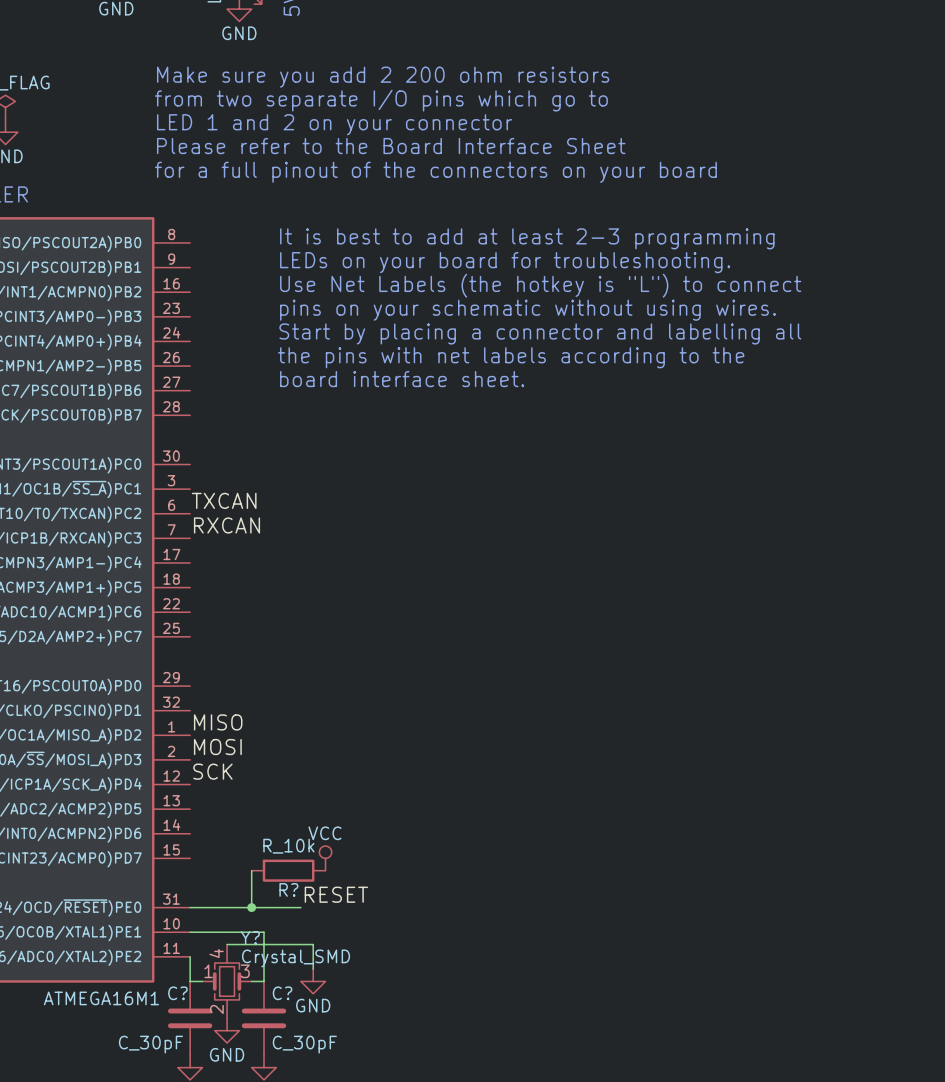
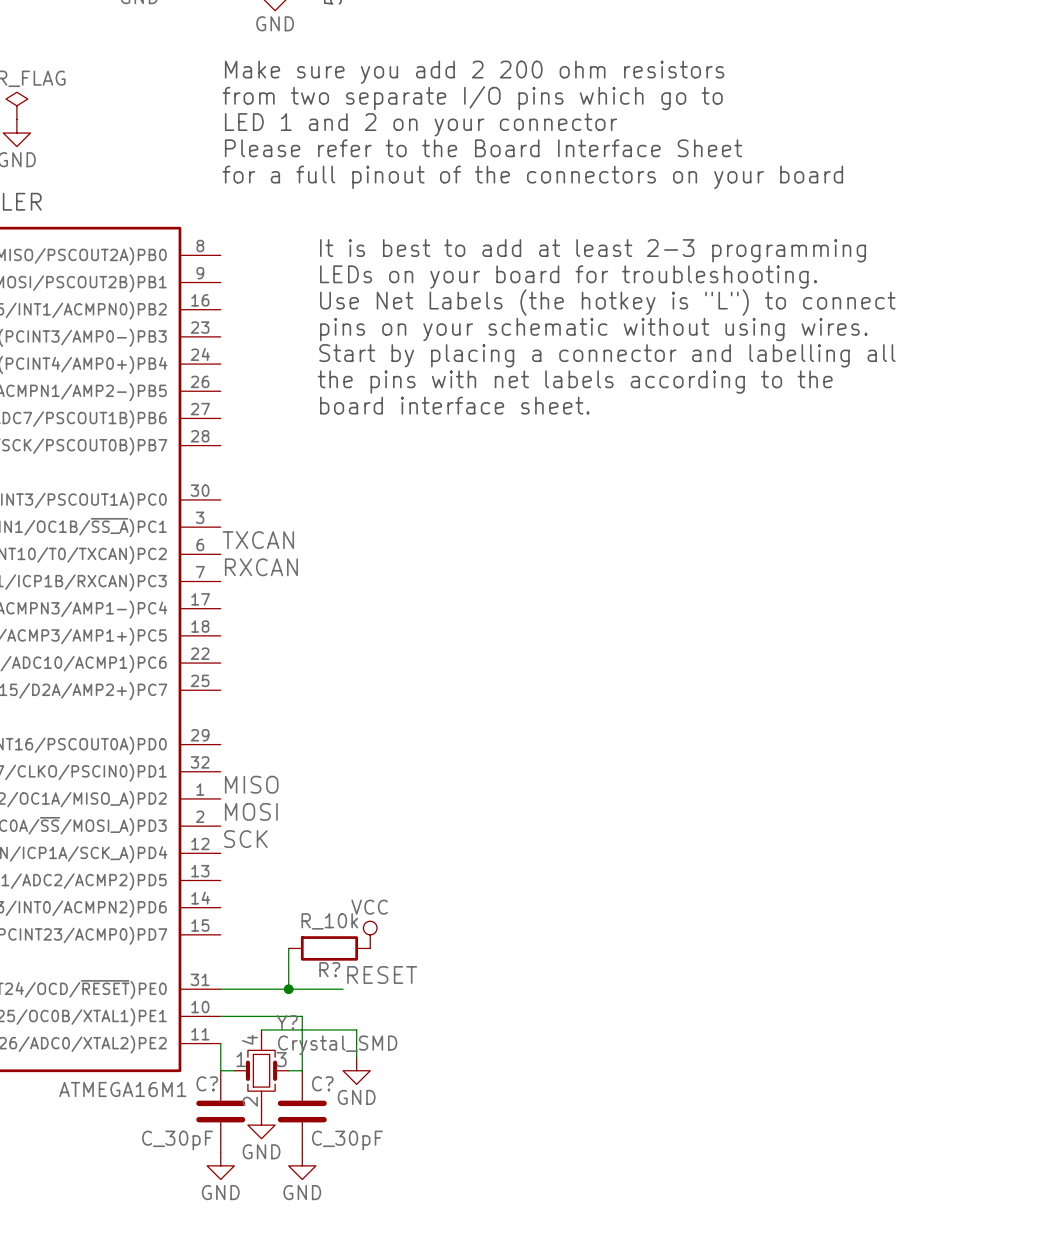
text position: Make sure you add 2 200 ohm resistors (383, 77) -> Make sure you add 2 200 ohm resistors (474, 72)
text position: from two separate I/O pins which go to (381, 100) -> from two separate I/O pins which go to (472, 98)
text position: LED 1 and 2 on your connector (334, 124) -> LED 1 and 2 on your connector (421, 124)
text position: Please refer to the Board Interface Sheet (391, 146) -> Please refer to the Board Interface Sheet (483, 148)
text position: for a full pinout of the connectors on your board (435, 172) -> for a full pinout of the connectors on your board (532, 177)

